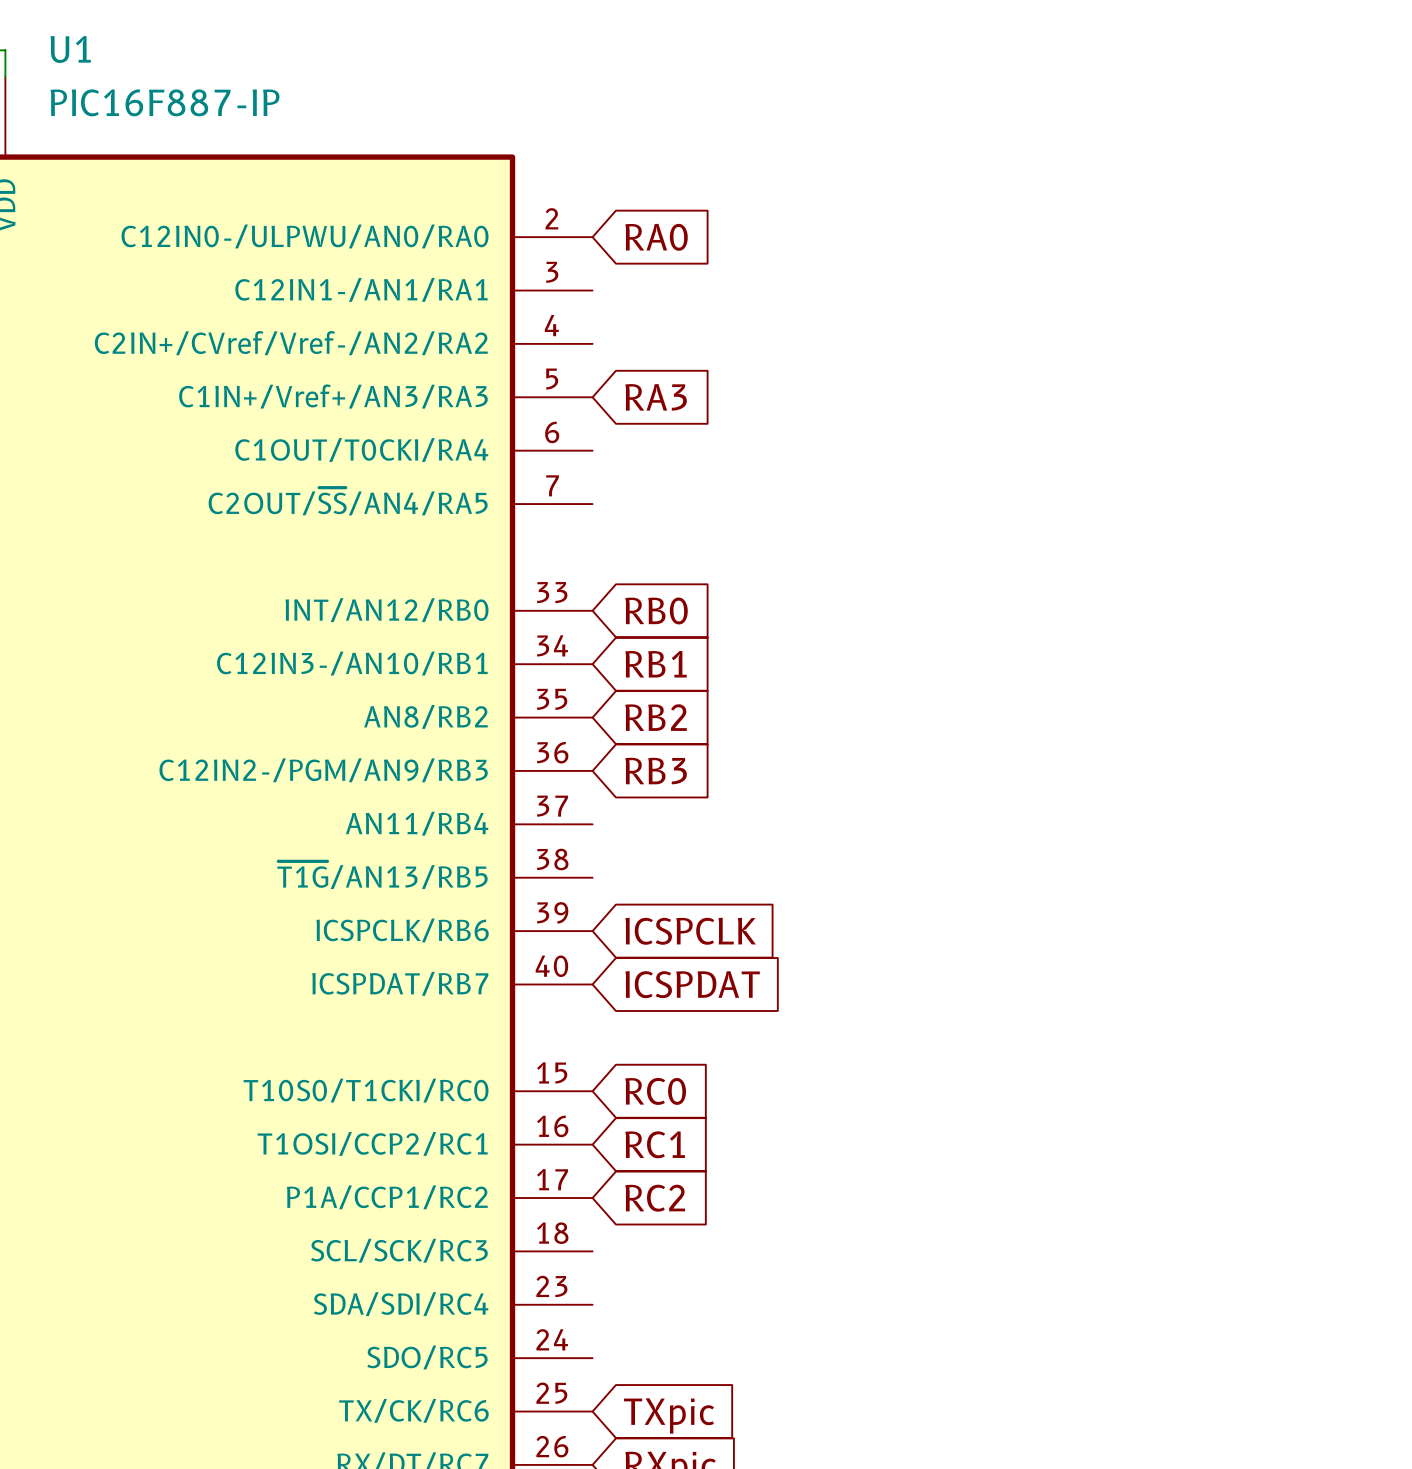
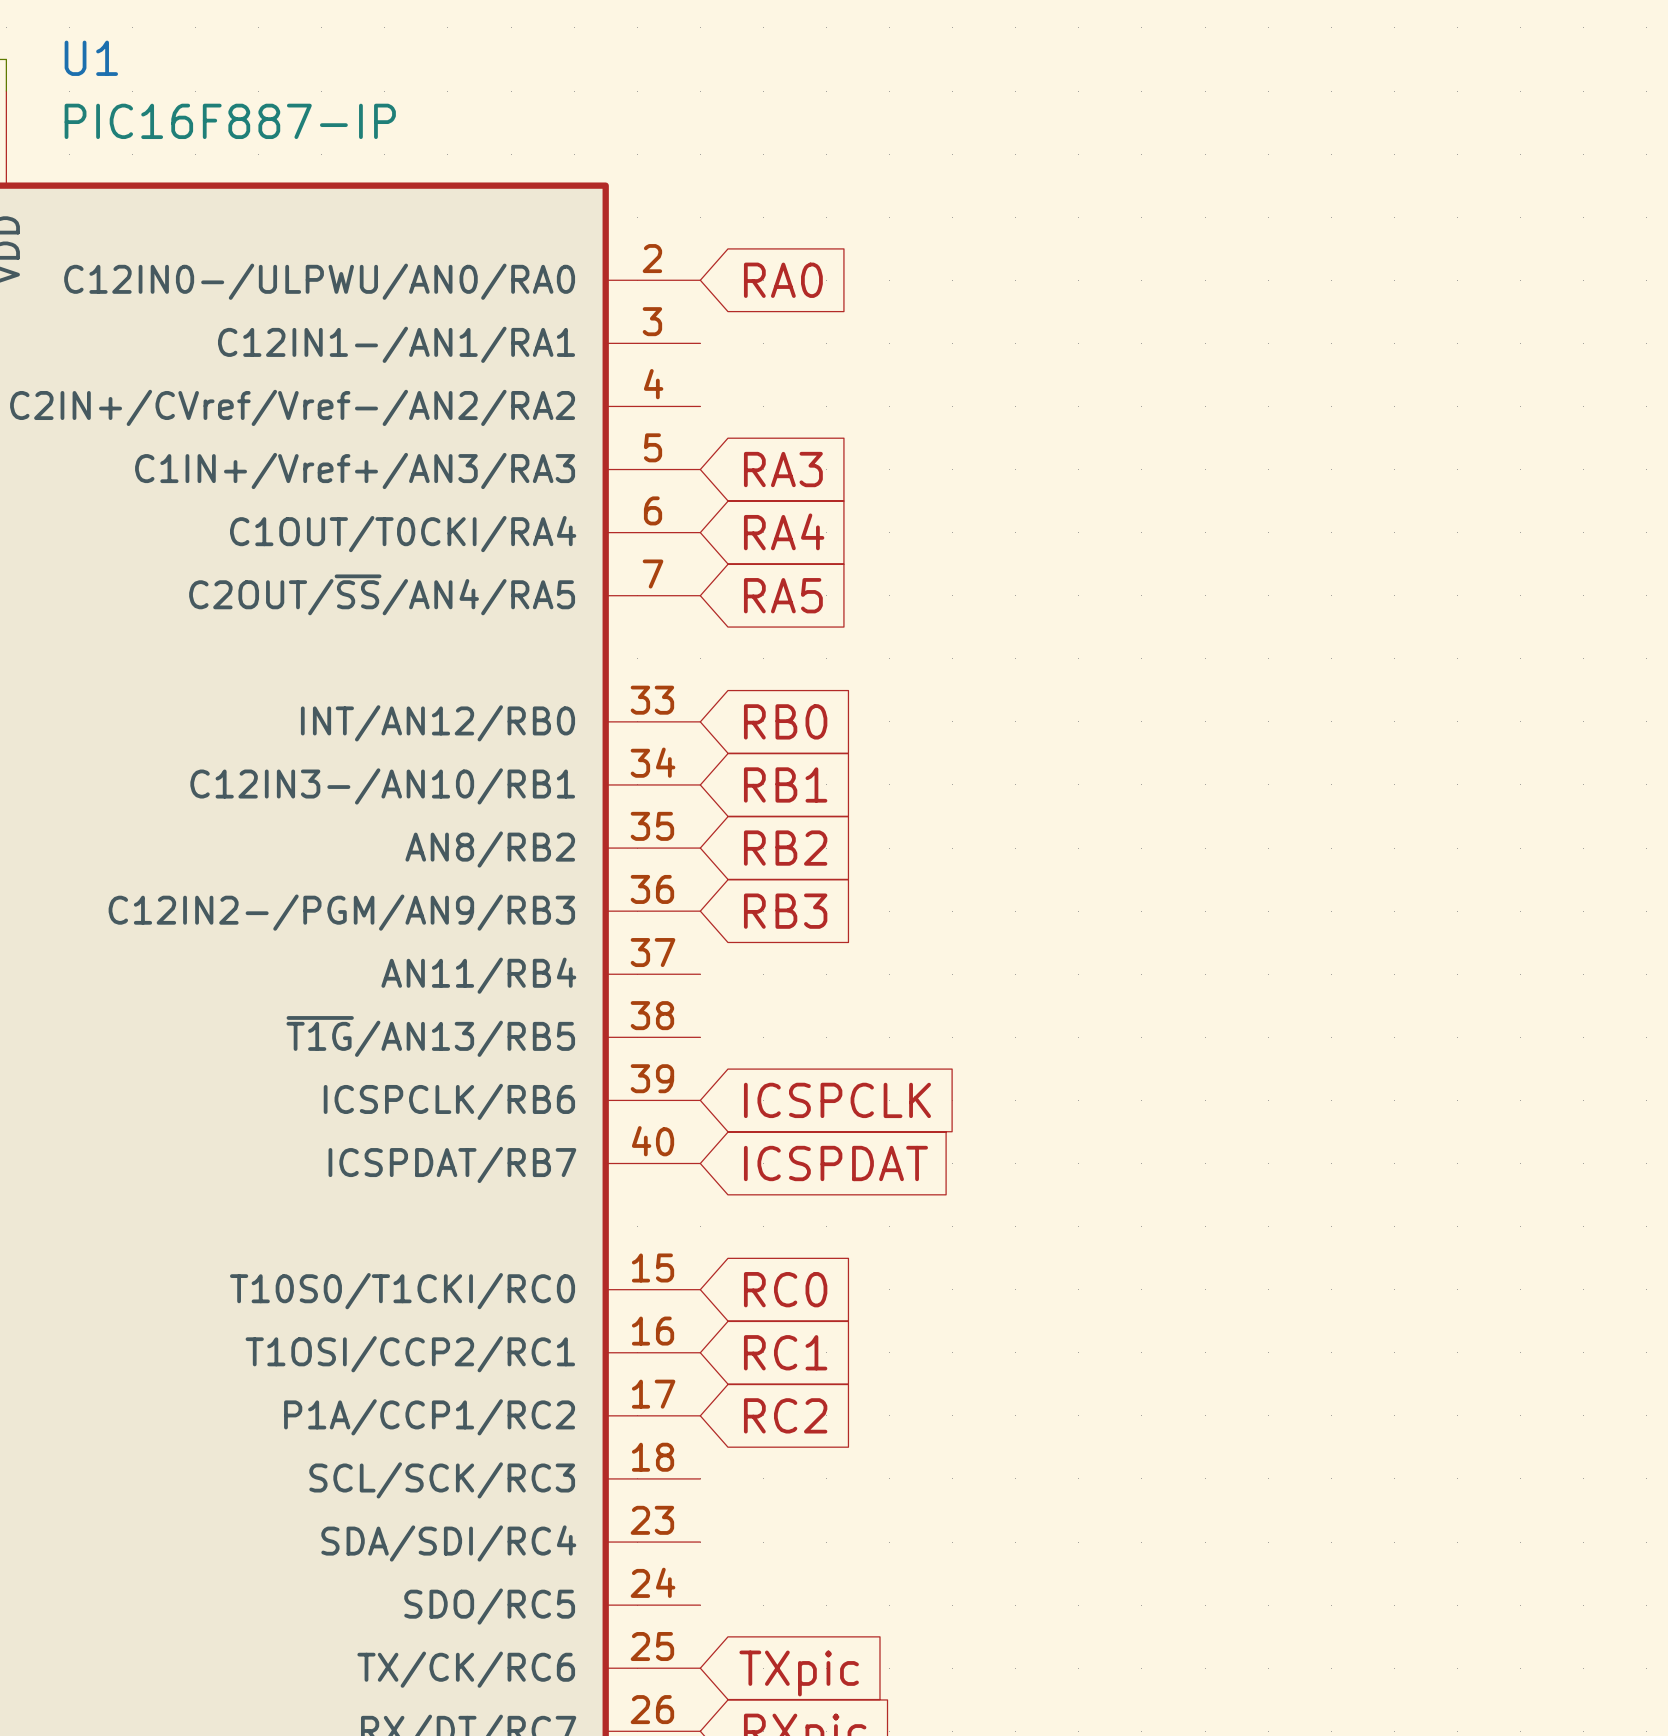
global label: none -> RA4 (784, 531)
global label: none -> RA5 (783, 595)

